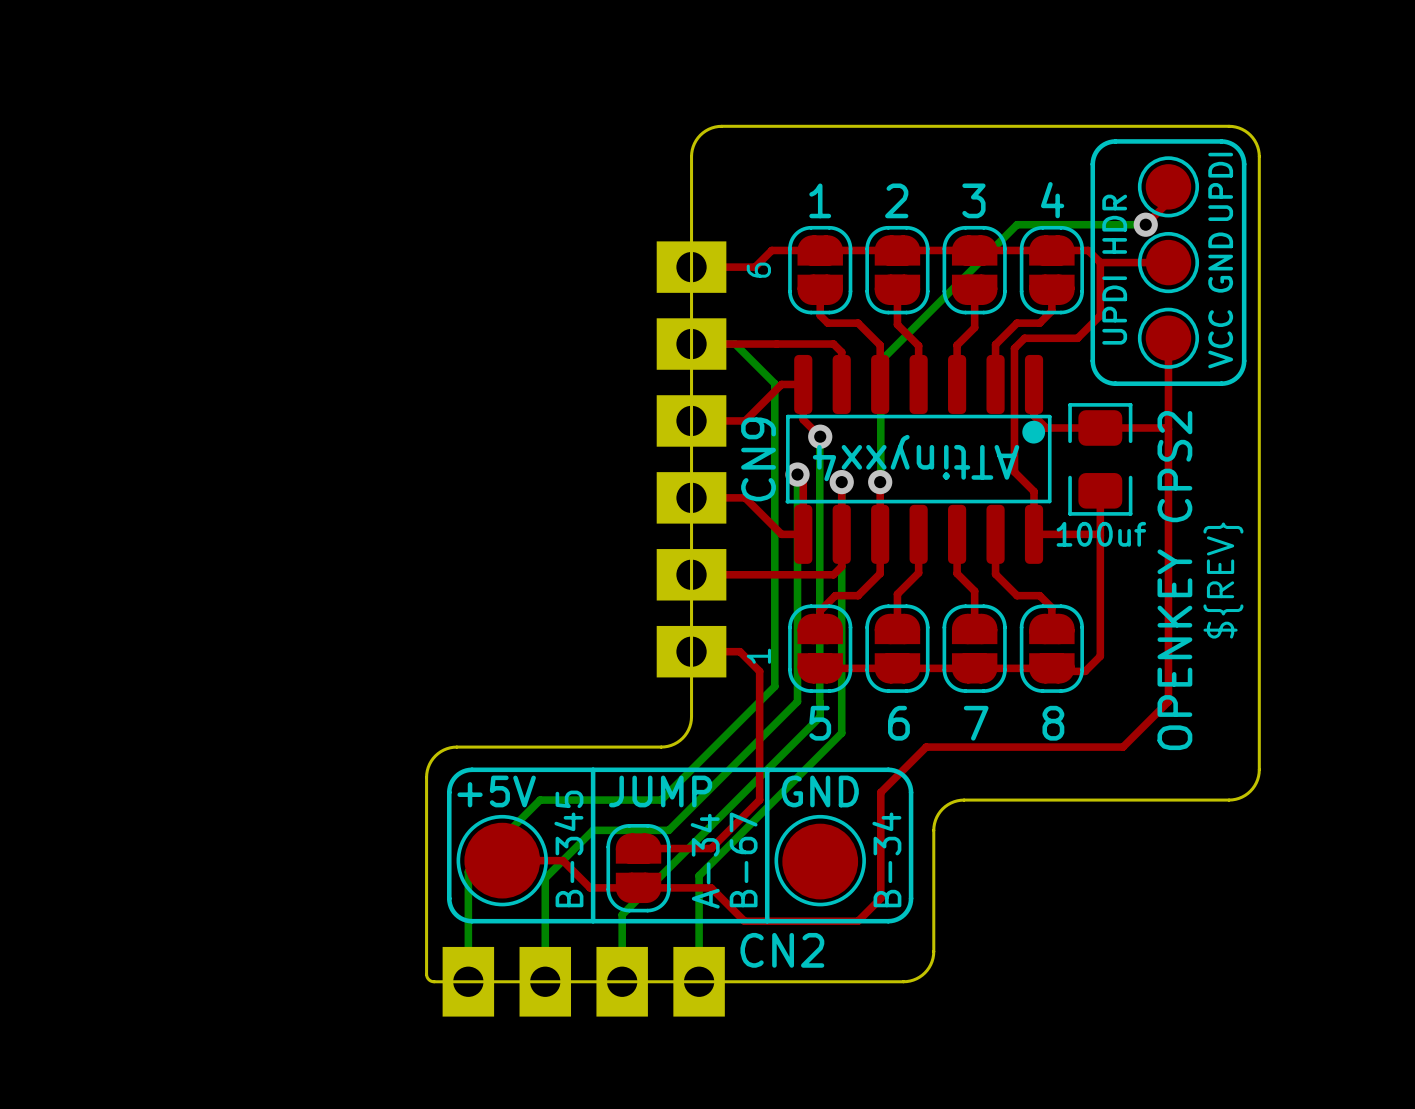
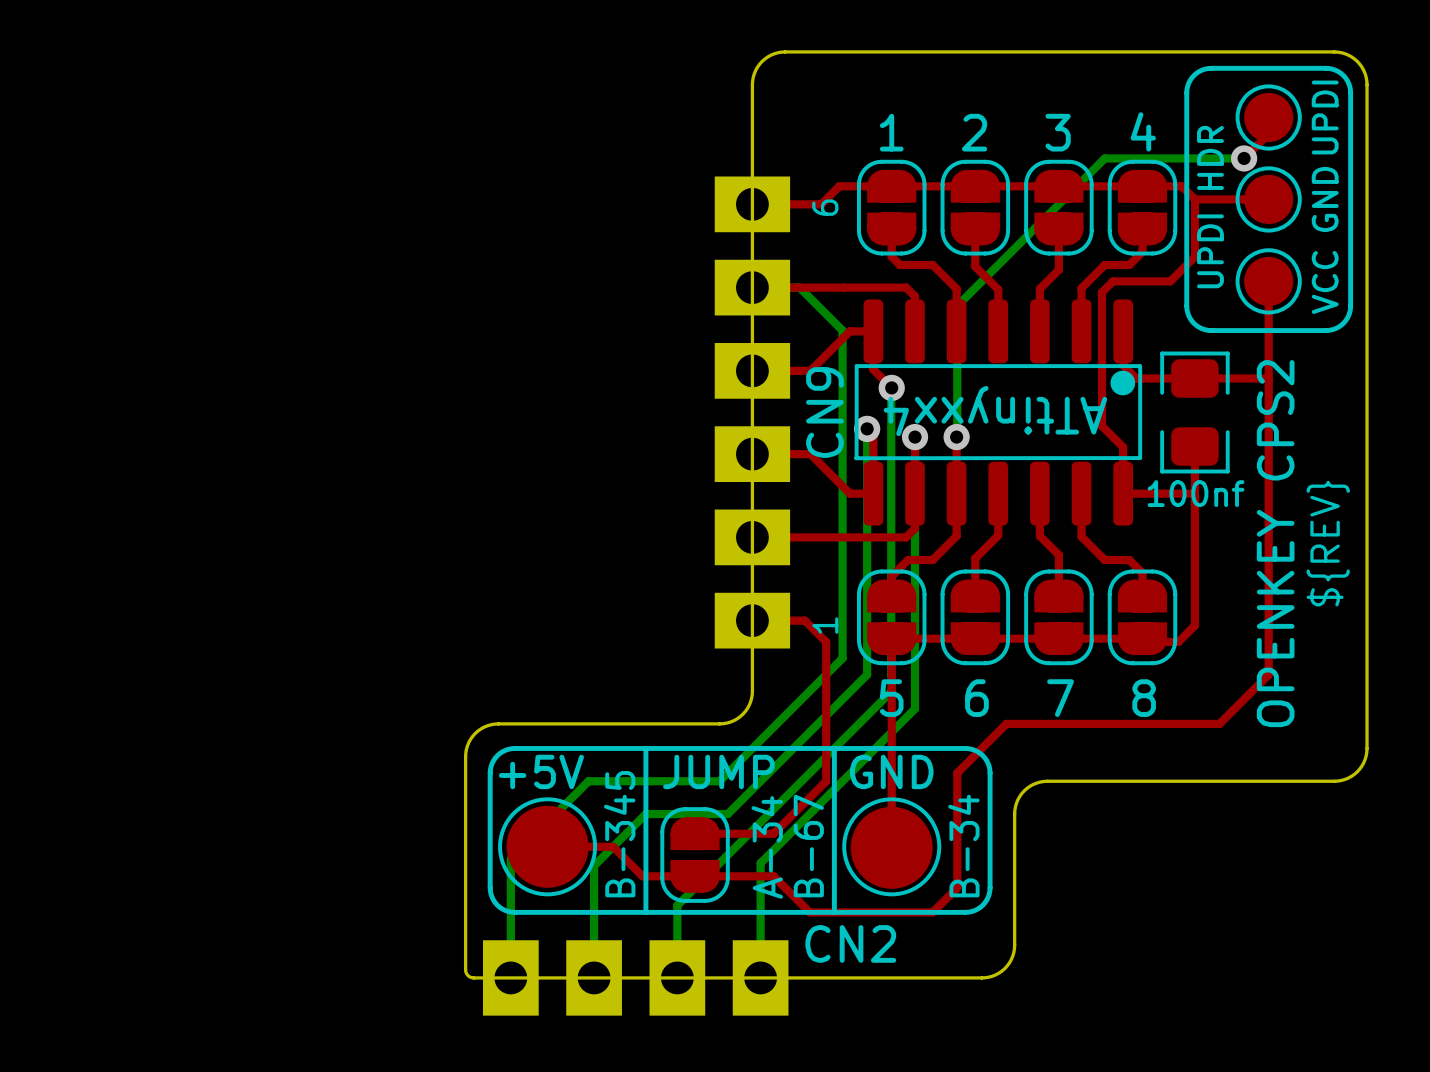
part value: 100uf (1101, 534) -> 100nf (1196, 493)
top track: none -> (891, 638) (891, 847)

